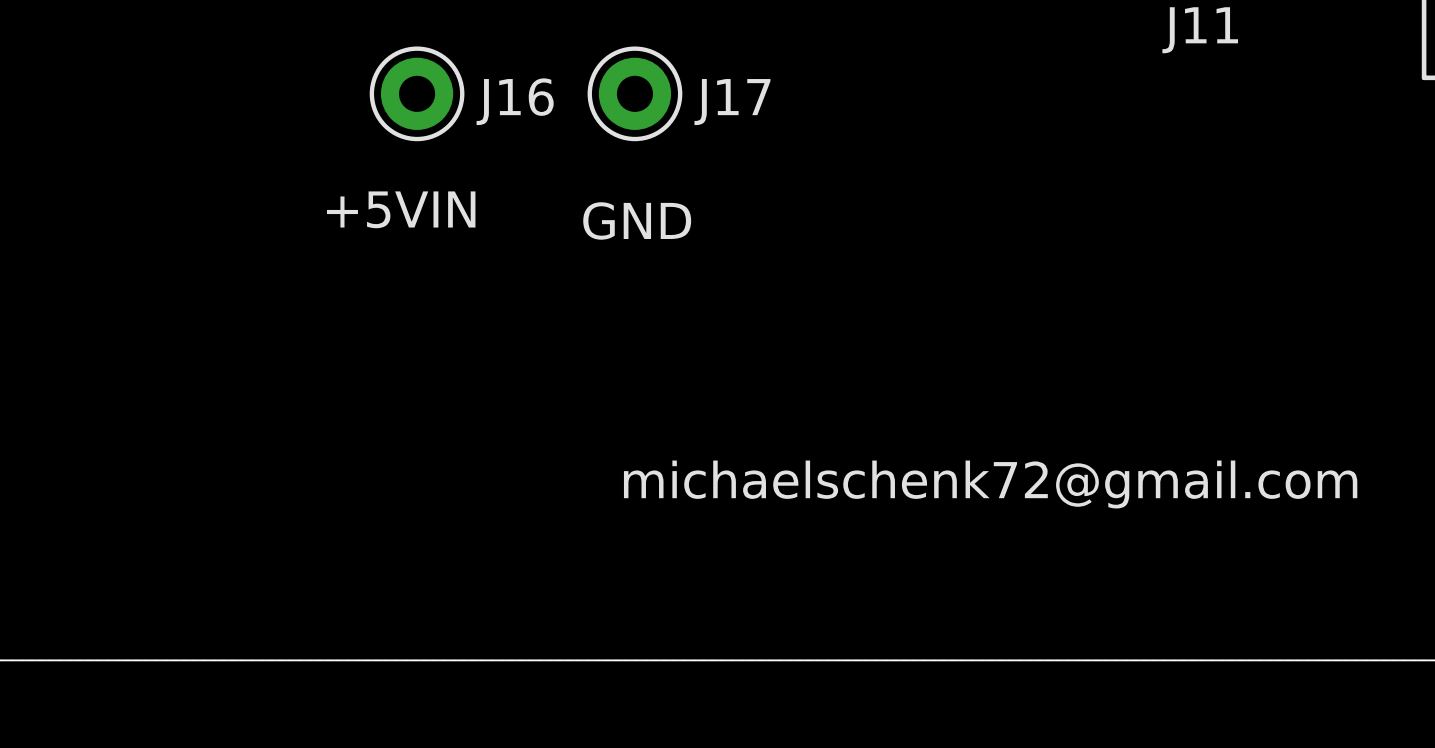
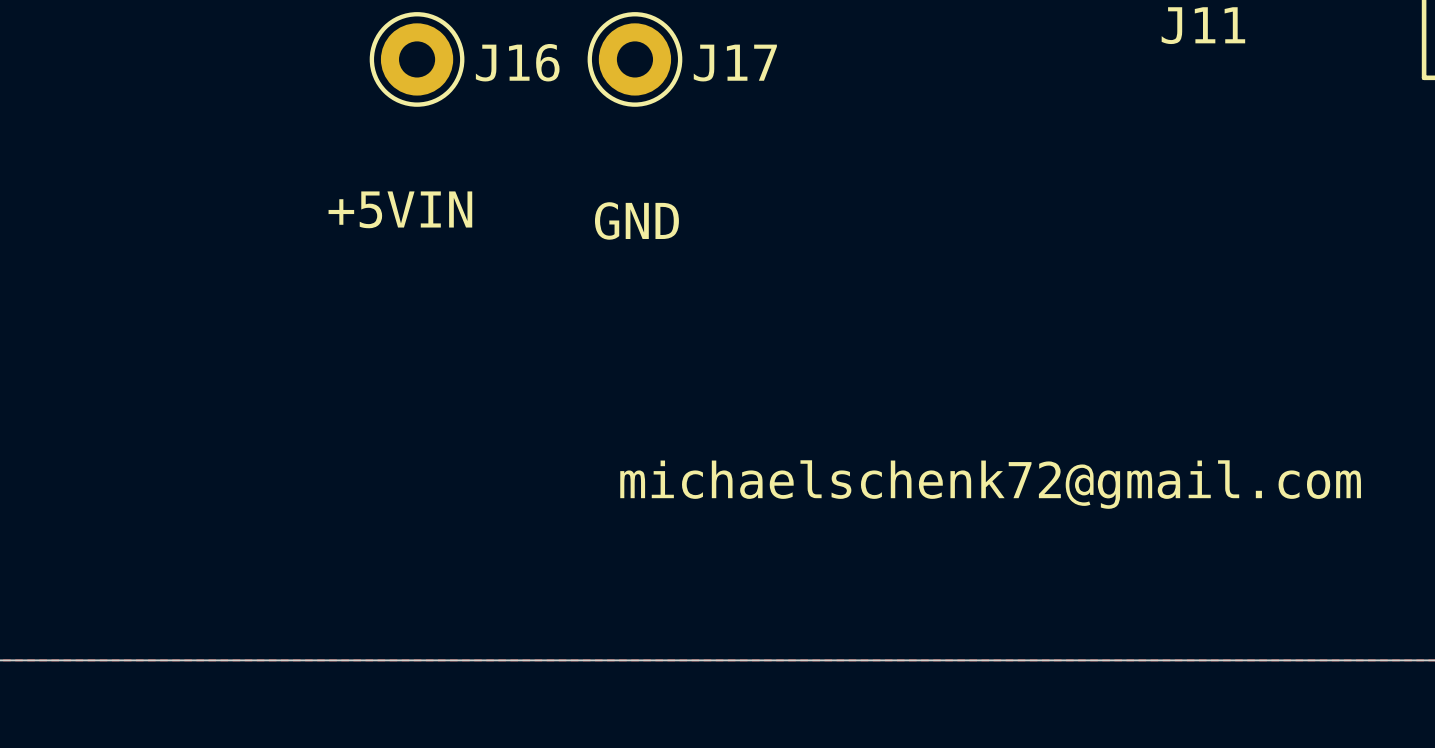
J16 position: (417, 93) -> (417, 59)
J17 position: (634, 93) -> (634, 59)

